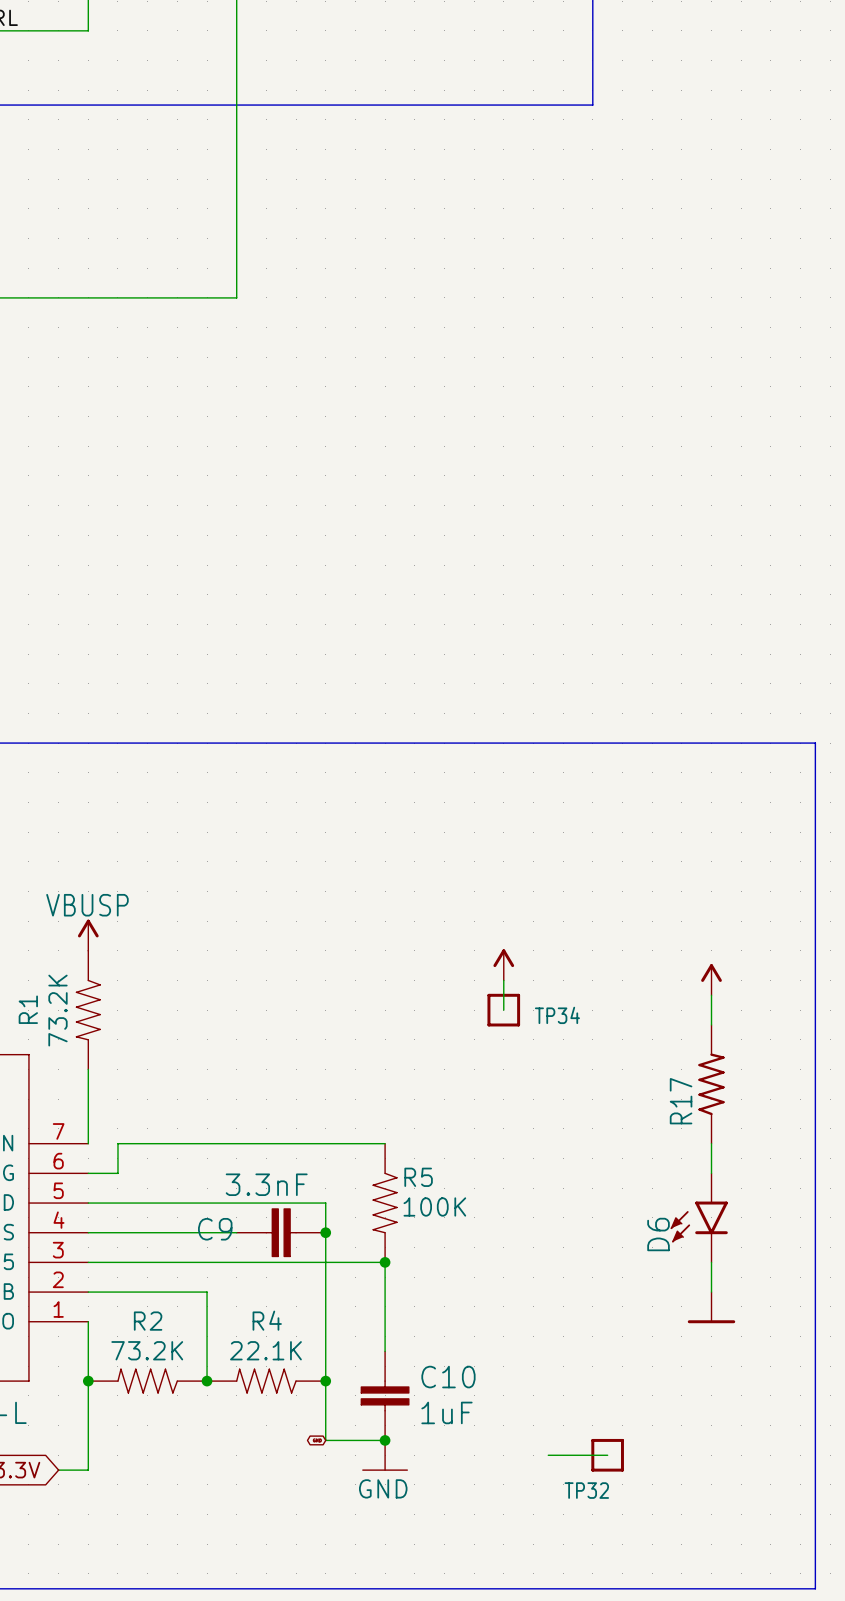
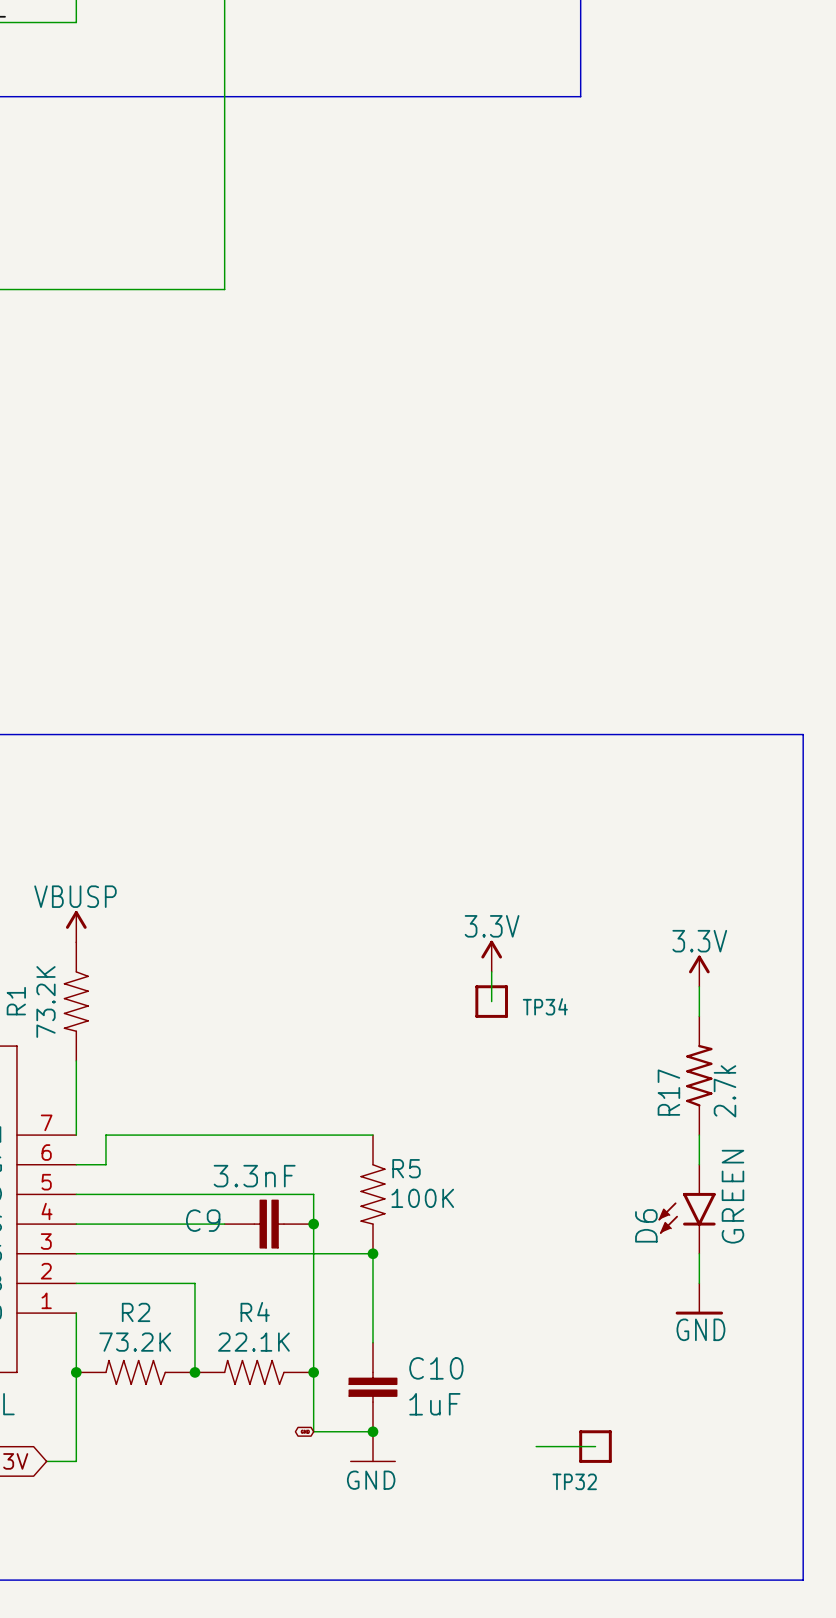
power symbol text: none -> 3.3V (492, 926)
power symbol text: none -> 3.3V (699, 941)
R17 value: none -> 2.7k (724, 1091)
D6 value: none -> GREEN (732, 1196)
power symbol text: none -> GND (700, 1329)

